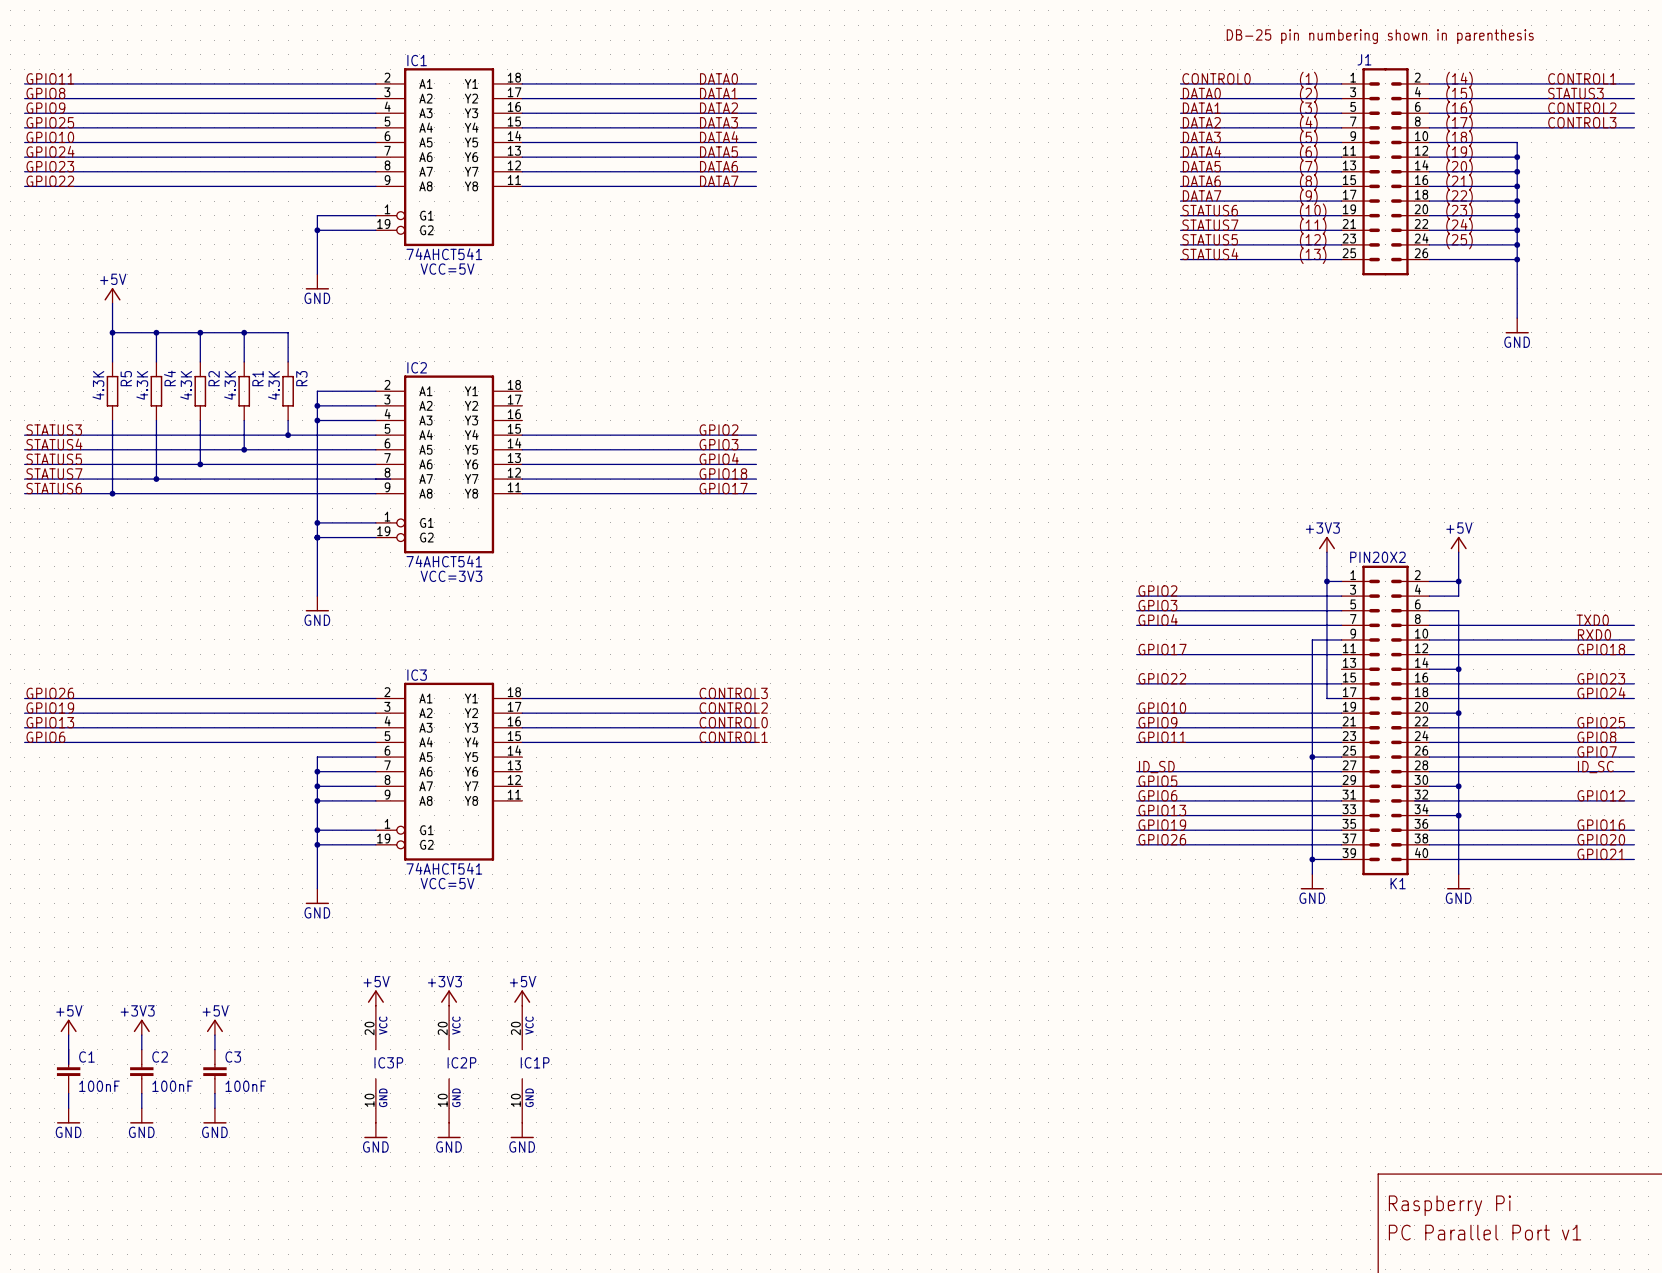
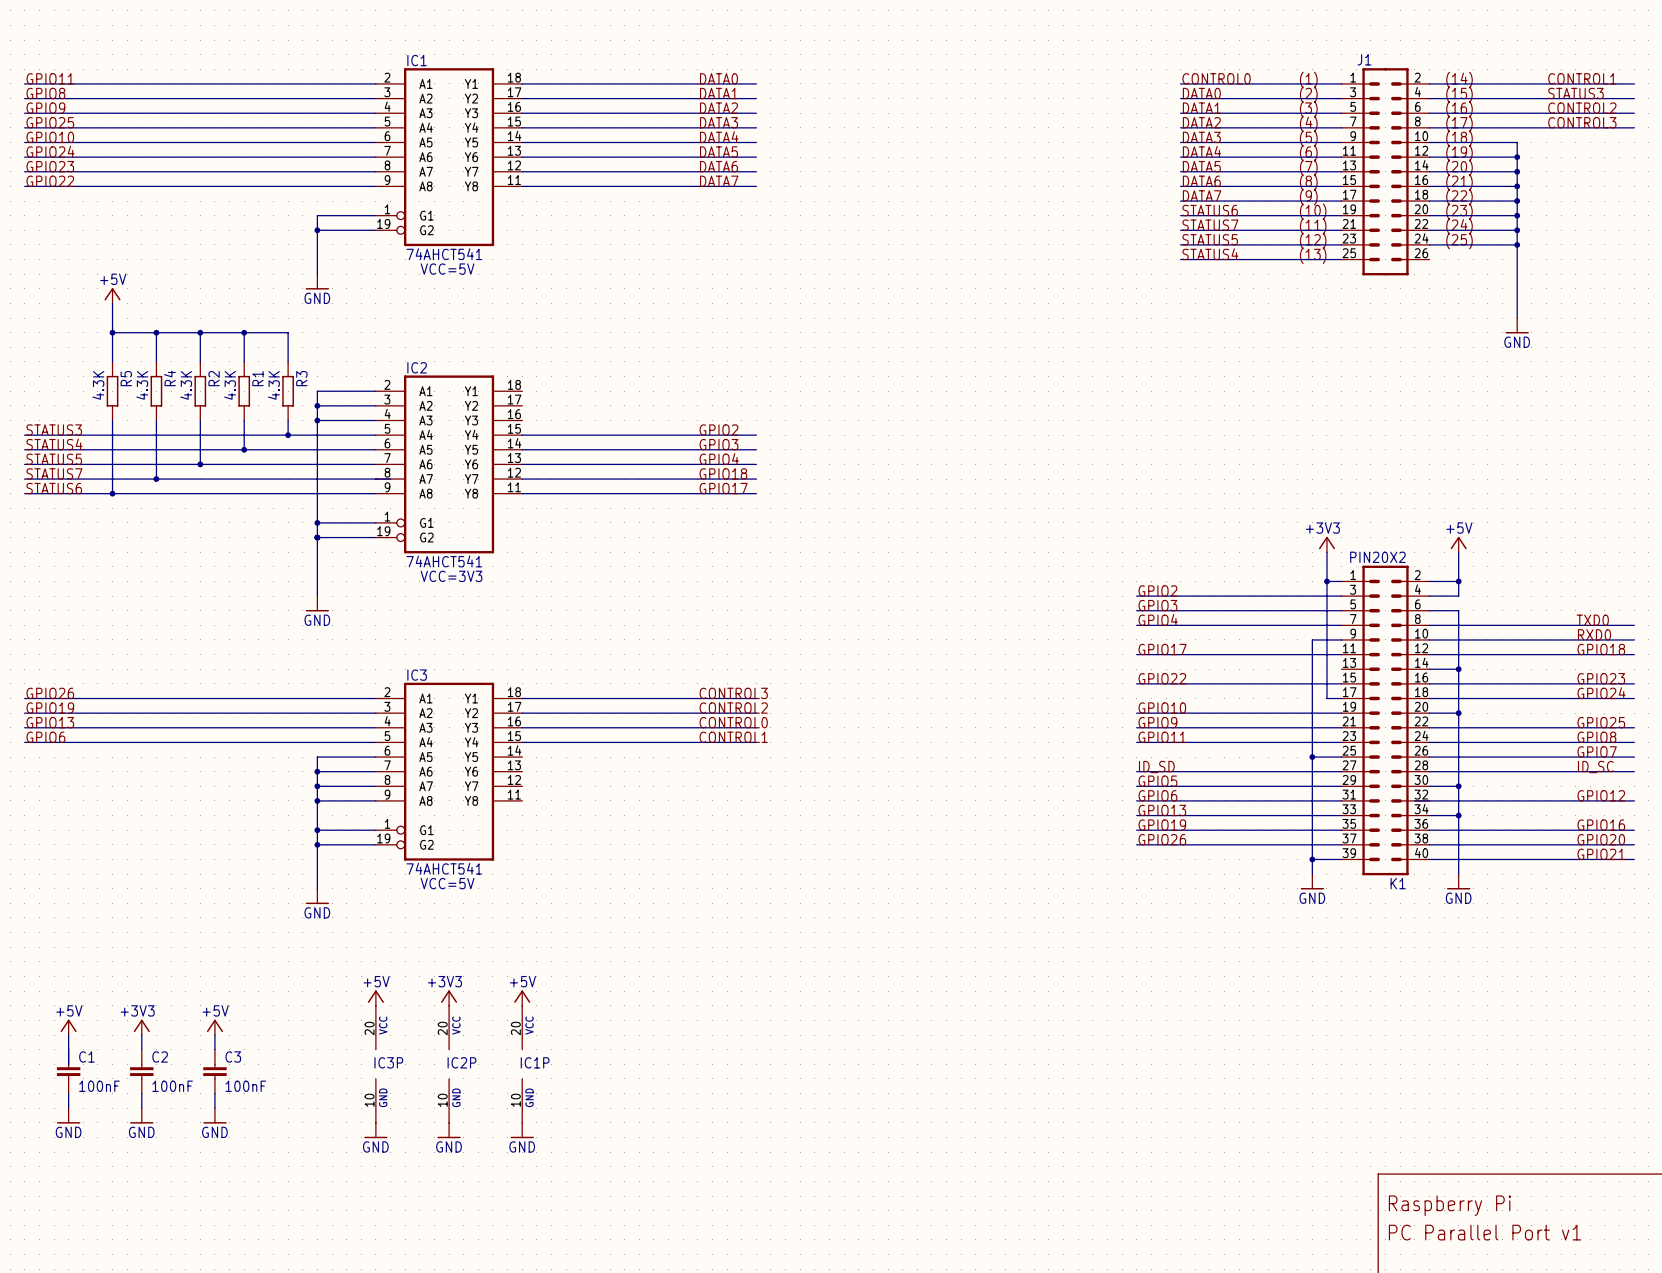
text: DB-25 pin numbering shown in parenthesis (1380, 36) -> none
wire: (1429, 259) (1517, 259) -> none
junction: (1517, 259) -> none

